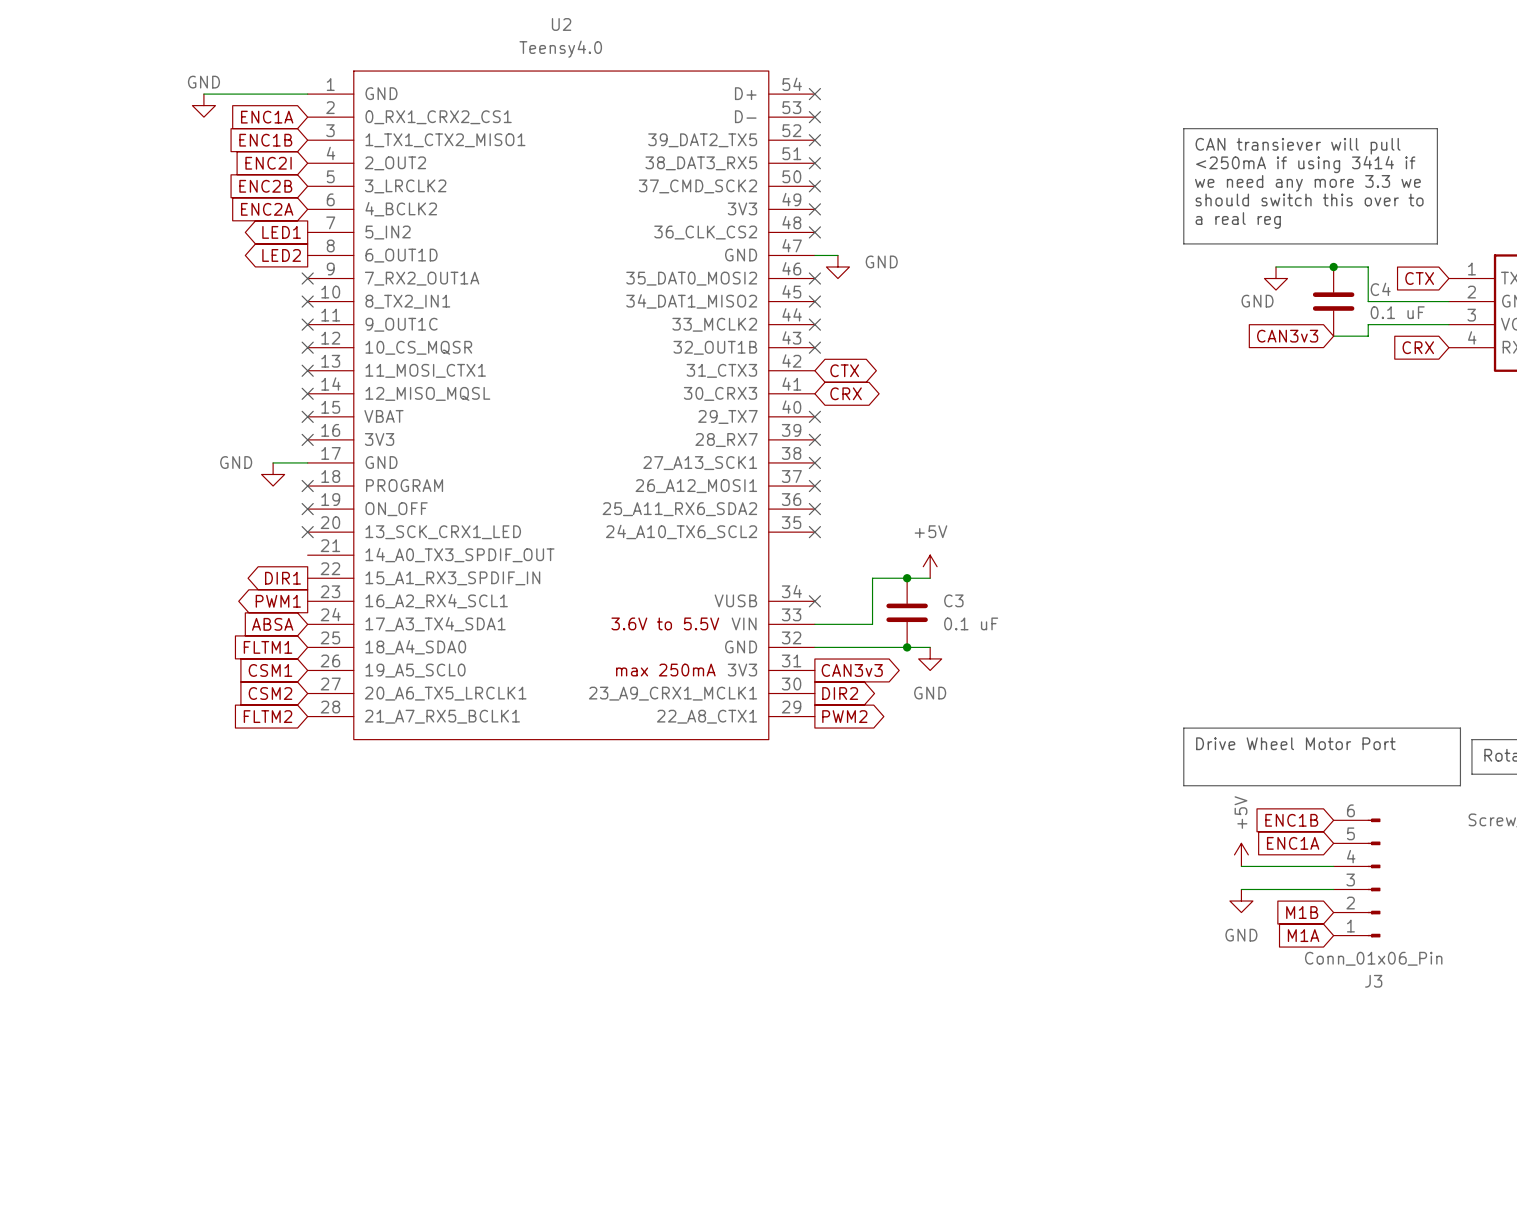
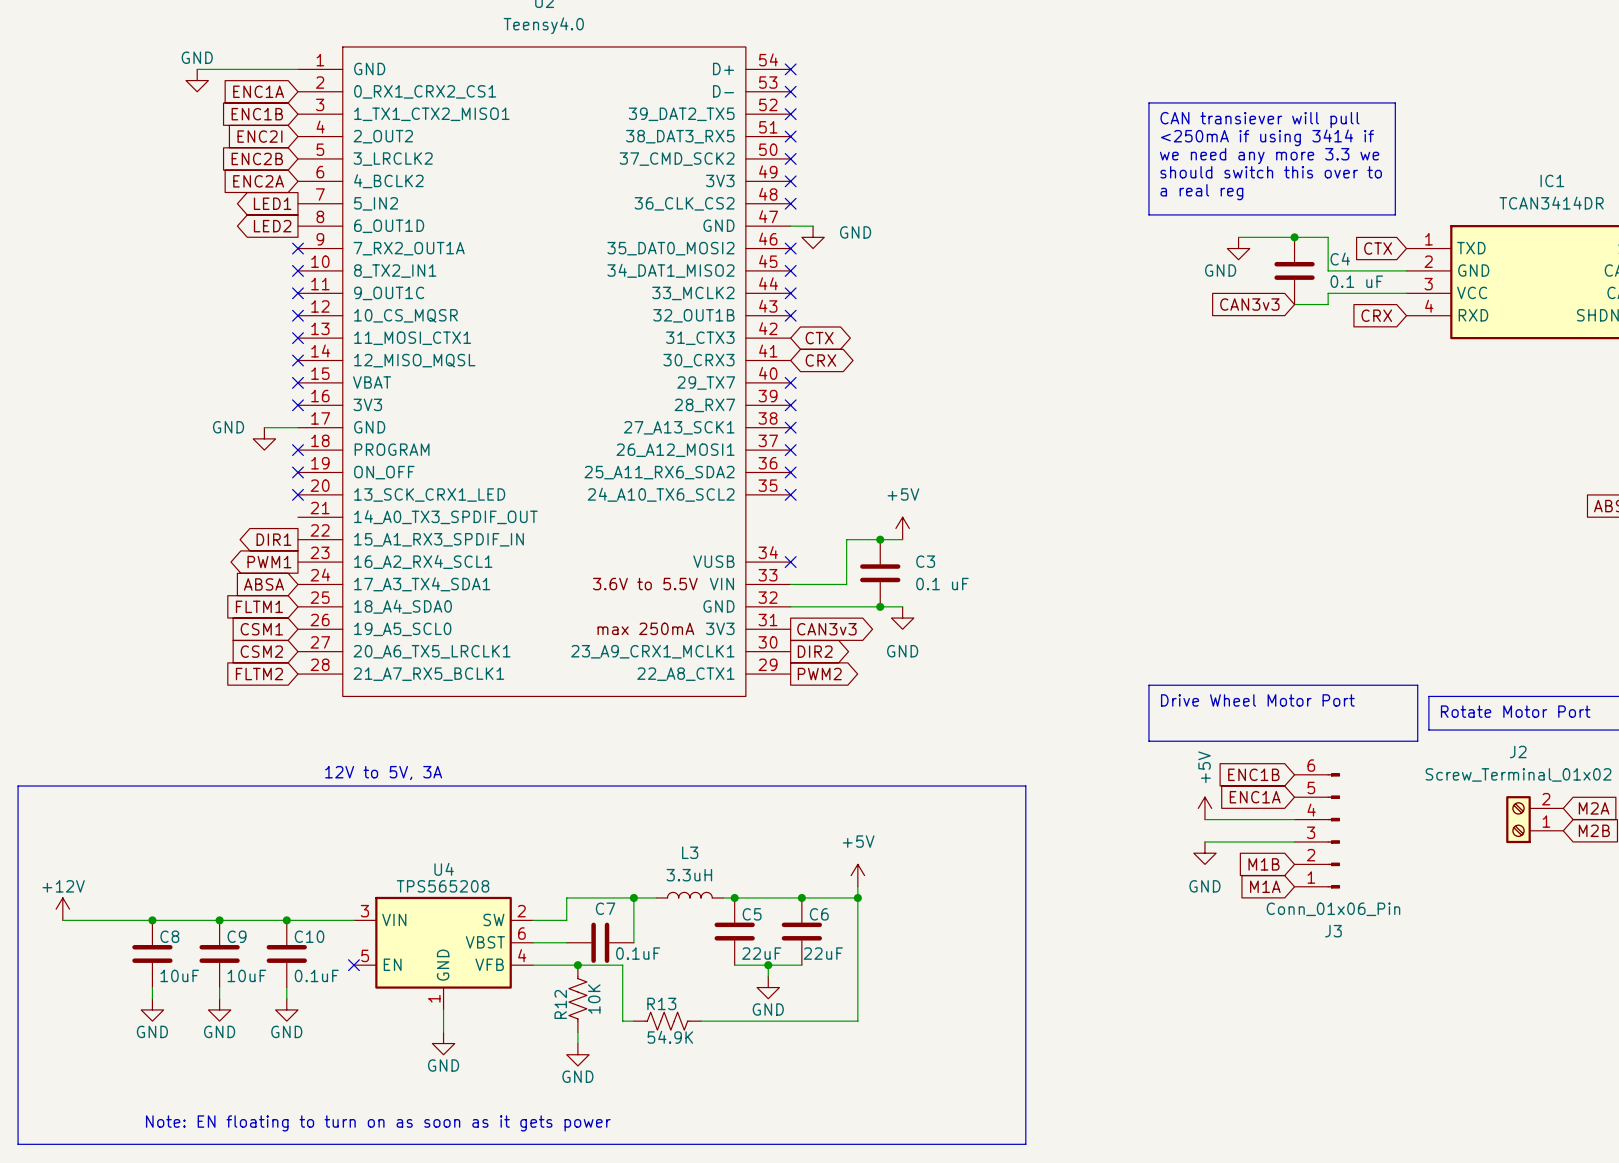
text: none -> 12V to 5V, 3A (383, 772)
line: none -> (18, 786) (1025, 786) (1025, 1144) (18, 1144) (18, 786)
power symbol: none -> +5V (857, 875)
wire: none -> (857, 886) (857, 1021) (701, 1021)
L3: none -> 3.3uH (689, 895)
wire: none -> (633, 897) (633, 942)
junction: none -> (633, 897)
wire: none -> (656, 897) (566, 897) (566, 920) (533, 920)
wire: none -> (723, 897) (857, 897)
junction: none -> (734, 897)
junction: none -> (801, 897)
junction: none -> (857, 897)
power symbol: none -> +12V (62, 909)
wire: none -> (62, 920) (353, 920)
junction: none -> (152, 920)
junction: none -> (219, 920)
junction: none -> (286, 920)
C5: none -> 22uF (734, 931)
C6: none -> 22uF (801, 931)
wire: none -> (533, 942) (566, 942)
C7: none -> 0.1uF (600, 942)
C8: none -> 10uF (152, 953)
C9: none -> 10uF (219, 953)
C10: none -> 0.1uF (286, 953)
U4: none -> TPS565208 (443, 953)
no-connect mark: none -> (353, 965)
wire: none -> (533, 965) (622, 965) (622, 1021) (633, 1021)
junction: none -> (577, 965)
wire: none -> (734, 965) (801, 965)
wire: none -> (768, 965) (768, 976)
junction: none -> (768, 965)
wire: none -> (152, 987) (152, 998)
wire: none -> (219, 987) (219, 998)
wire: none -> (286, 987) (286, 998)
power symbol: none -> GND (768, 987)
R12: none -> 10K (577, 998)
power symbol: none -> GND (152, 1009)
power symbol: none -> GND (219, 1009)
power symbol: none -> GND (286, 1009)
wire: none -> (443, 1009) (443, 1032)
R13: none -> 54.9K (667, 1021)
wire: none -> (577, 1032) (577, 1043)
power symbol: none -> GND (443, 1043)
power symbol: none -> GND (577, 1054)
text: none -> Note: EN floating to turn on as soon as it gets power (378, 1123)

